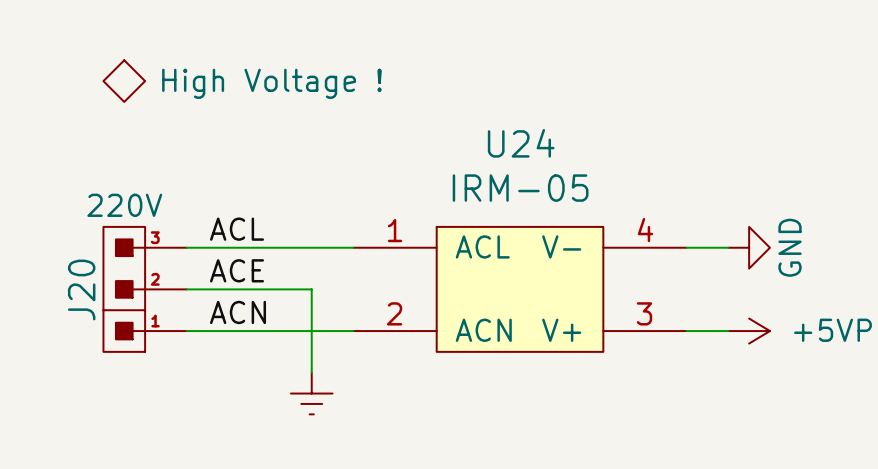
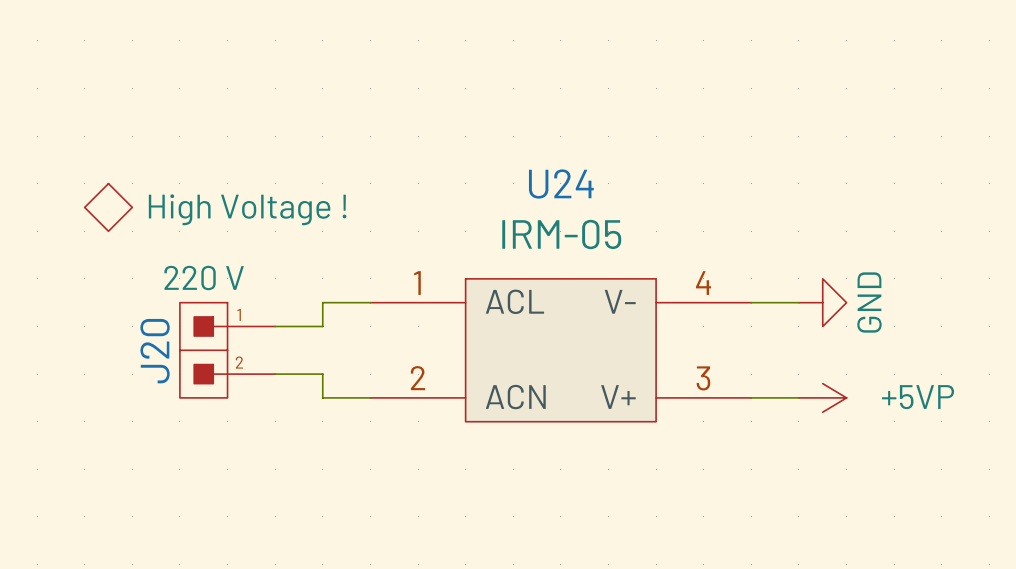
part position: (124, 81) -> (108, 207)
J20 value: 220V (124, 205) -> 220 V (204, 277)
J20 symbol: [103, 226, 187, 352] -> [179, 302, 276, 398]
label: ACL (237, 229) -> none
wire: (186, 247) (311, 247) -> (275, 326) (322, 326) (322, 302)
label: ACE (237, 270) -> none
wire: (186, 289) (311, 289) (311, 310) -> (275, 374) (322, 374)
label: ACN (238, 312) -> none
wire: (186, 331) (311, 331) (311, 372) -> none
power symbol: (311, 393) -> none

